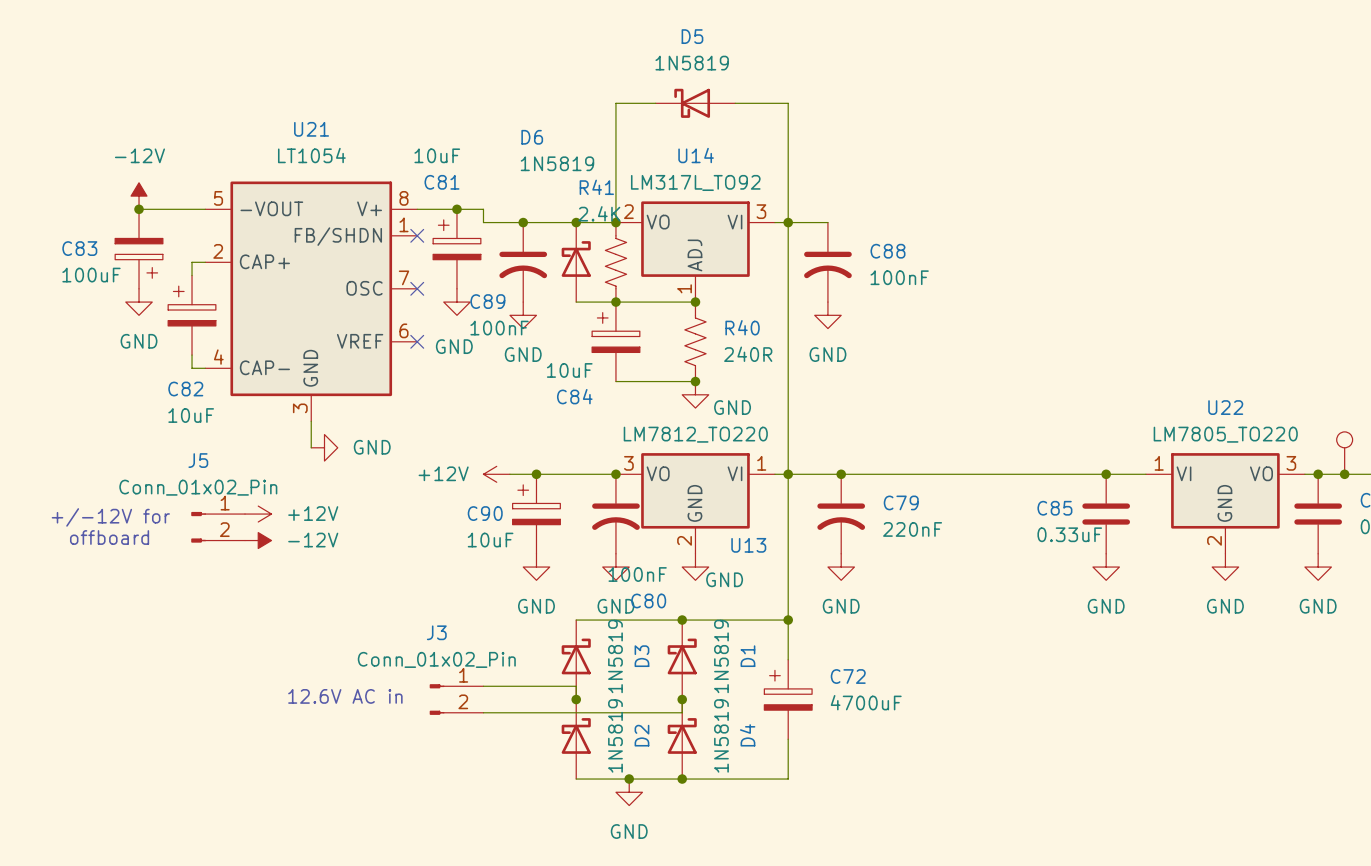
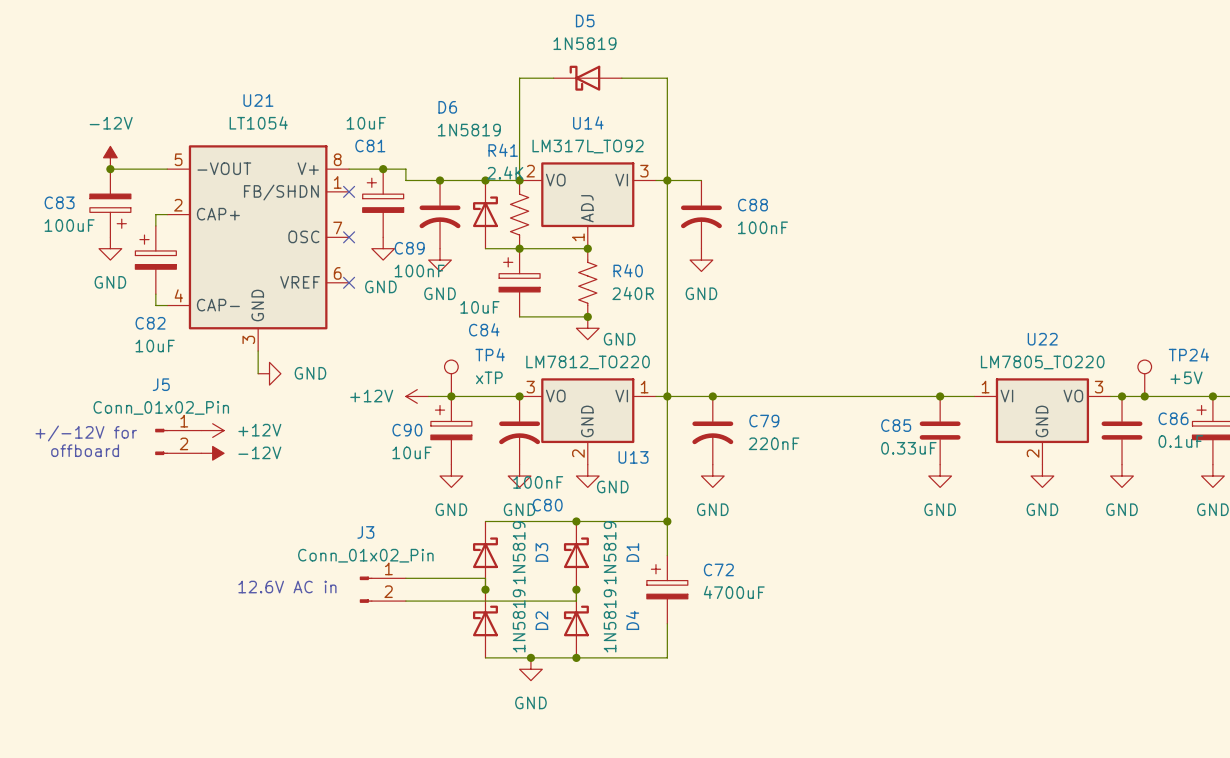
TP4: none -> xTP (451, 378)

